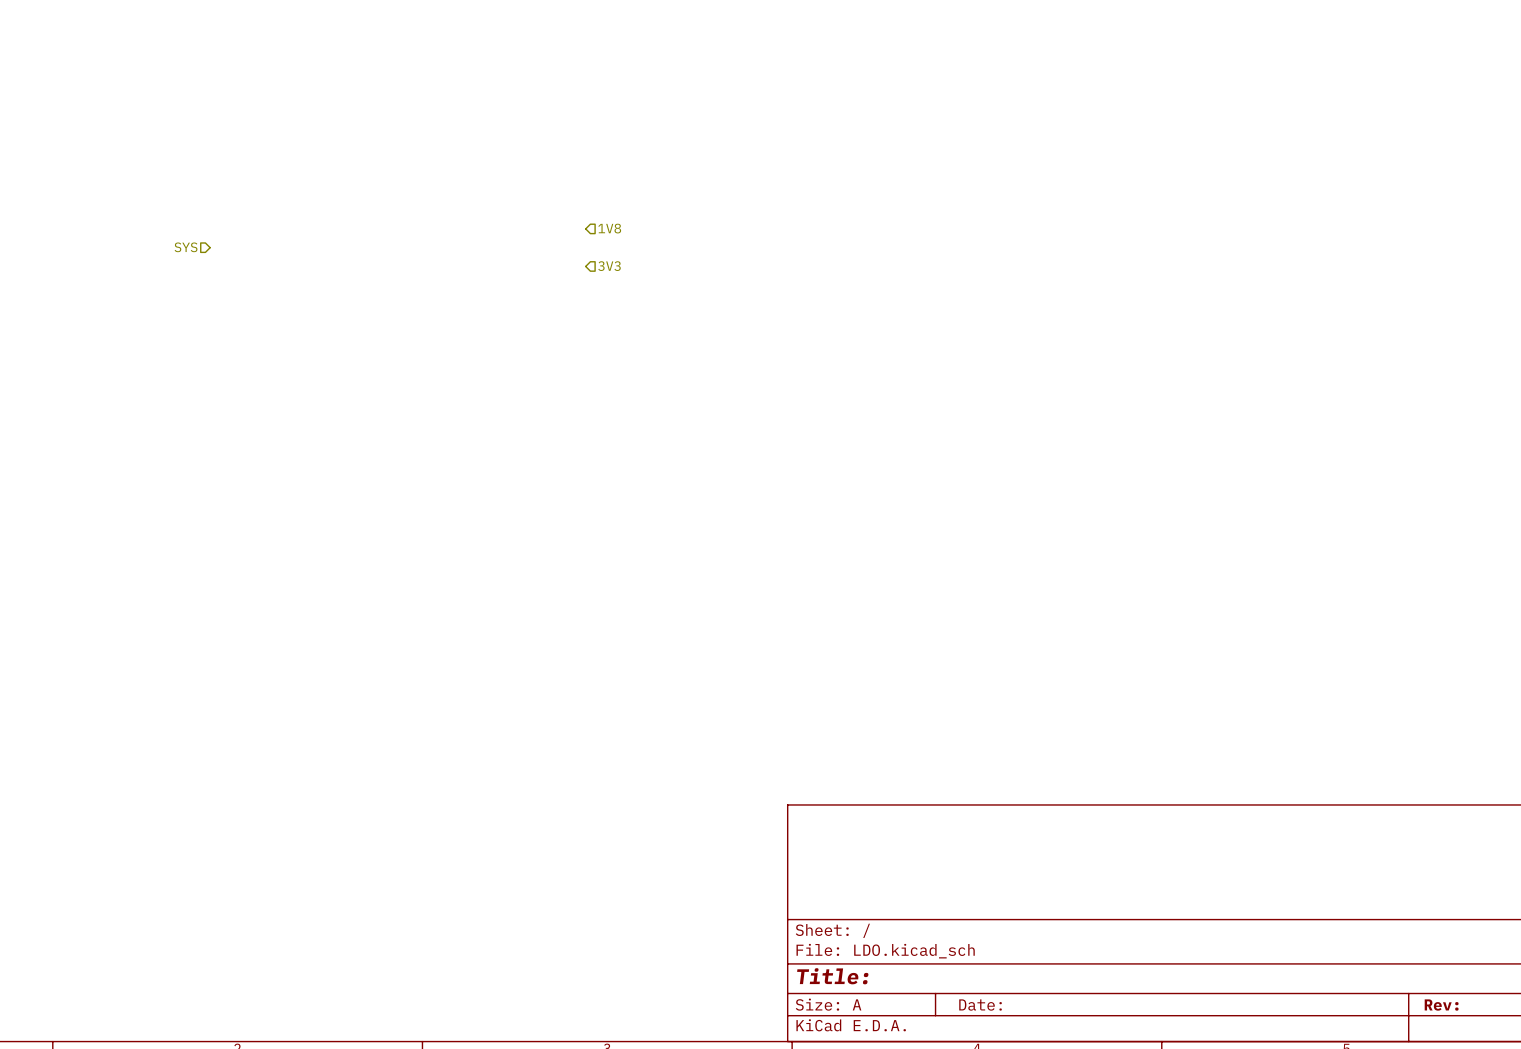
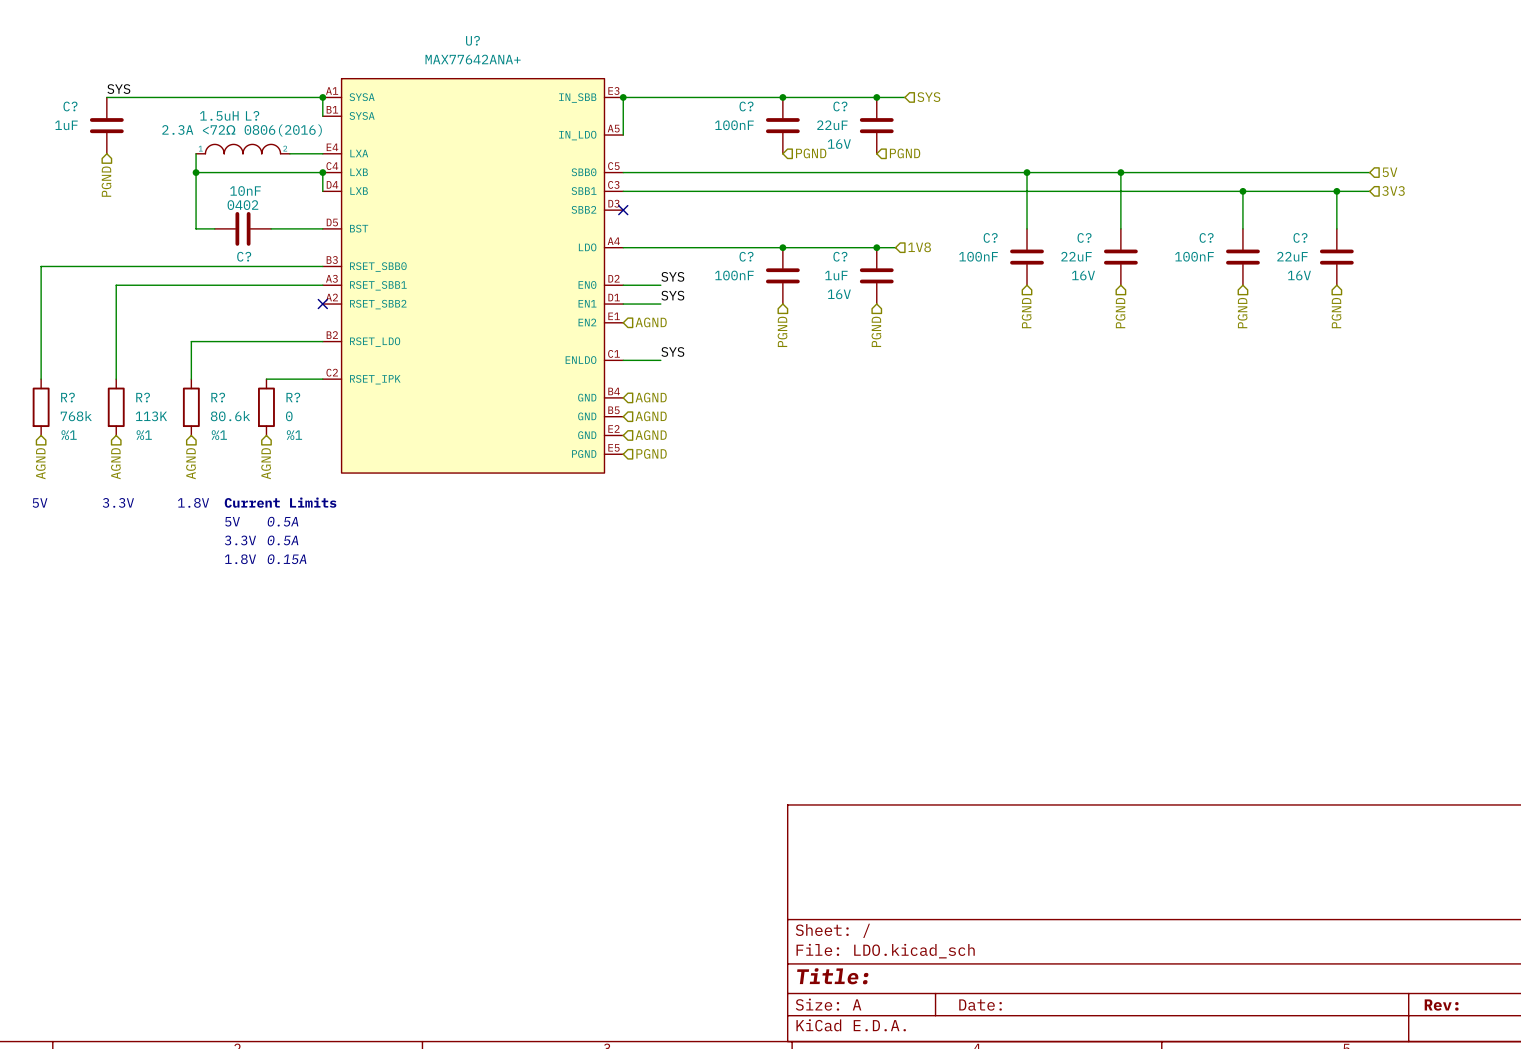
label: none -> SYS (118, 89)
wire: none -> (106, 97) (322, 97) (322, 116)
junction: none -> (322, 97)
junction: none -> (623, 97)
junction: none -> (782, 97)
junction: none -> (876, 97)
wire: none -> (904, 97) (623, 97) (623, 135)
hierarchical label: none -> SYS (928, 97)
C?: none -> 1uF (106, 125)
C?: none -> 100nF (782, 125)
C?: none -> 22uF (876, 125)
L?: none -> 1.5uH (242, 149)
wire: none -> (196, 153) (196, 228) (214, 228)
wire: none -> (289, 153) (322, 153)
hierarchical label: none -> PGND (811, 153)
hierarchical label: none -> PGND (905, 153)
wire: none -> (196, 172) (322, 172) (322, 191)
junction: none -> (196, 172)
junction: none -> (322, 172)
wire: none -> (623, 172) (1369, 172)
wire: none -> (1027, 172) (1027, 228)
junction: none -> (1027, 172)
wire: none -> (1120, 172) (1120, 228)
junction: none -> (1120, 172)
hierarchical label: none -> 5V (1389, 172)
hierarchical label: none -> PGND (106, 181)
wire: none -> (623, 191) (1369, 191)
wire: none -> (1242, 191) (1242, 228)
junction: none -> (1242, 191)
wire: none -> (1336, 191) (1336, 228)
junction: none -> (1336, 191)
hierarchical label: none -> 3V3 (1393, 191)
no-connect mark: none -> (623, 210)
C?: none -> 10nF (242, 228)
wire: none -> (271, 228) (322, 228)
hierarchical label: 1V8 (609, 228) -> none
hierarchical label: SYS (186, 247) -> none
wire: none -> (623, 247) (895, 247)
junction: none -> (782, 247)
junction: none -> (876, 247)
hierarchical label: none -> 1V8 (919, 247)
C?: none -> 100nF (1027, 257)
C?: none -> 22uF (1120, 257)
C?: none -> 100nF (1242, 257)
C?: none -> 22uF (1336, 257)
wire: none -> (322, 266) (41, 266) (41, 379)
hierarchical label: 3V3 (609, 266) -> none
U?: none -> MAX77642ANA+ (473, 275)
C?: none -> 100nF (782, 275)
C?: none -> 1uF (876, 275)
label: none -> SYS (672, 276)
wire: none -> (322, 285) (116, 285) (116, 379)
wire: none -> (623, 285) (660, 285)
label: none -> SYS (672, 295)
no-connect mark: none -> (322, 304)
wire: none -> (623, 304) (660, 304)
hierarchical label: none -> PGND (1026, 313)
hierarchical label: none -> PGND (1120, 313)
hierarchical label: none -> PGND (1242, 313)
hierarchical label: none -> PGND (1336, 313)
hierarchical label: none -> AGND (651, 322)
hierarchical label: none -> PGND (782, 331)
hierarchical label: none -> PGND (876, 331)
wire: none -> (322, 341) (191, 341) (191, 379)
label: none -> SYS (672, 351)
wire: none -> (623, 360) (660, 360)
wire: none -> (266, 379) (322, 379)
hierarchical label: none -> AGND (651, 397)
R?: none -> 768k (41, 407)
R?: none -> 113K (116, 407)
R?: none -> 80.6k (191, 407)
R?: none -> 0 (266, 407)
hierarchical label: none -> AGND (651, 416)
hierarchical label: none -> AGND (651, 435)
hierarchical label: none -> PGND (651, 453)
hierarchical label: none -> AGND (40, 463)
hierarchical label: none -> AGND (115, 463)
hierarchical label: none -> AGND (191, 463)
hierarchical label: none -> AGND (266, 463)
text: none -> 5V (40, 502)
text: none -> 3.3V (118, 502)
text: none -> 1.8V (193, 502)
text: none -> Current Limits (280, 502)
text: none -> 5V (232, 521)
text: none -> 0.5A (283, 521)
text: none -> 3.3V (240, 540)
text: none -> 0.5A (283, 540)
text: none -> 1.8V (240, 559)
text: none -> 0.15A (287, 559)

